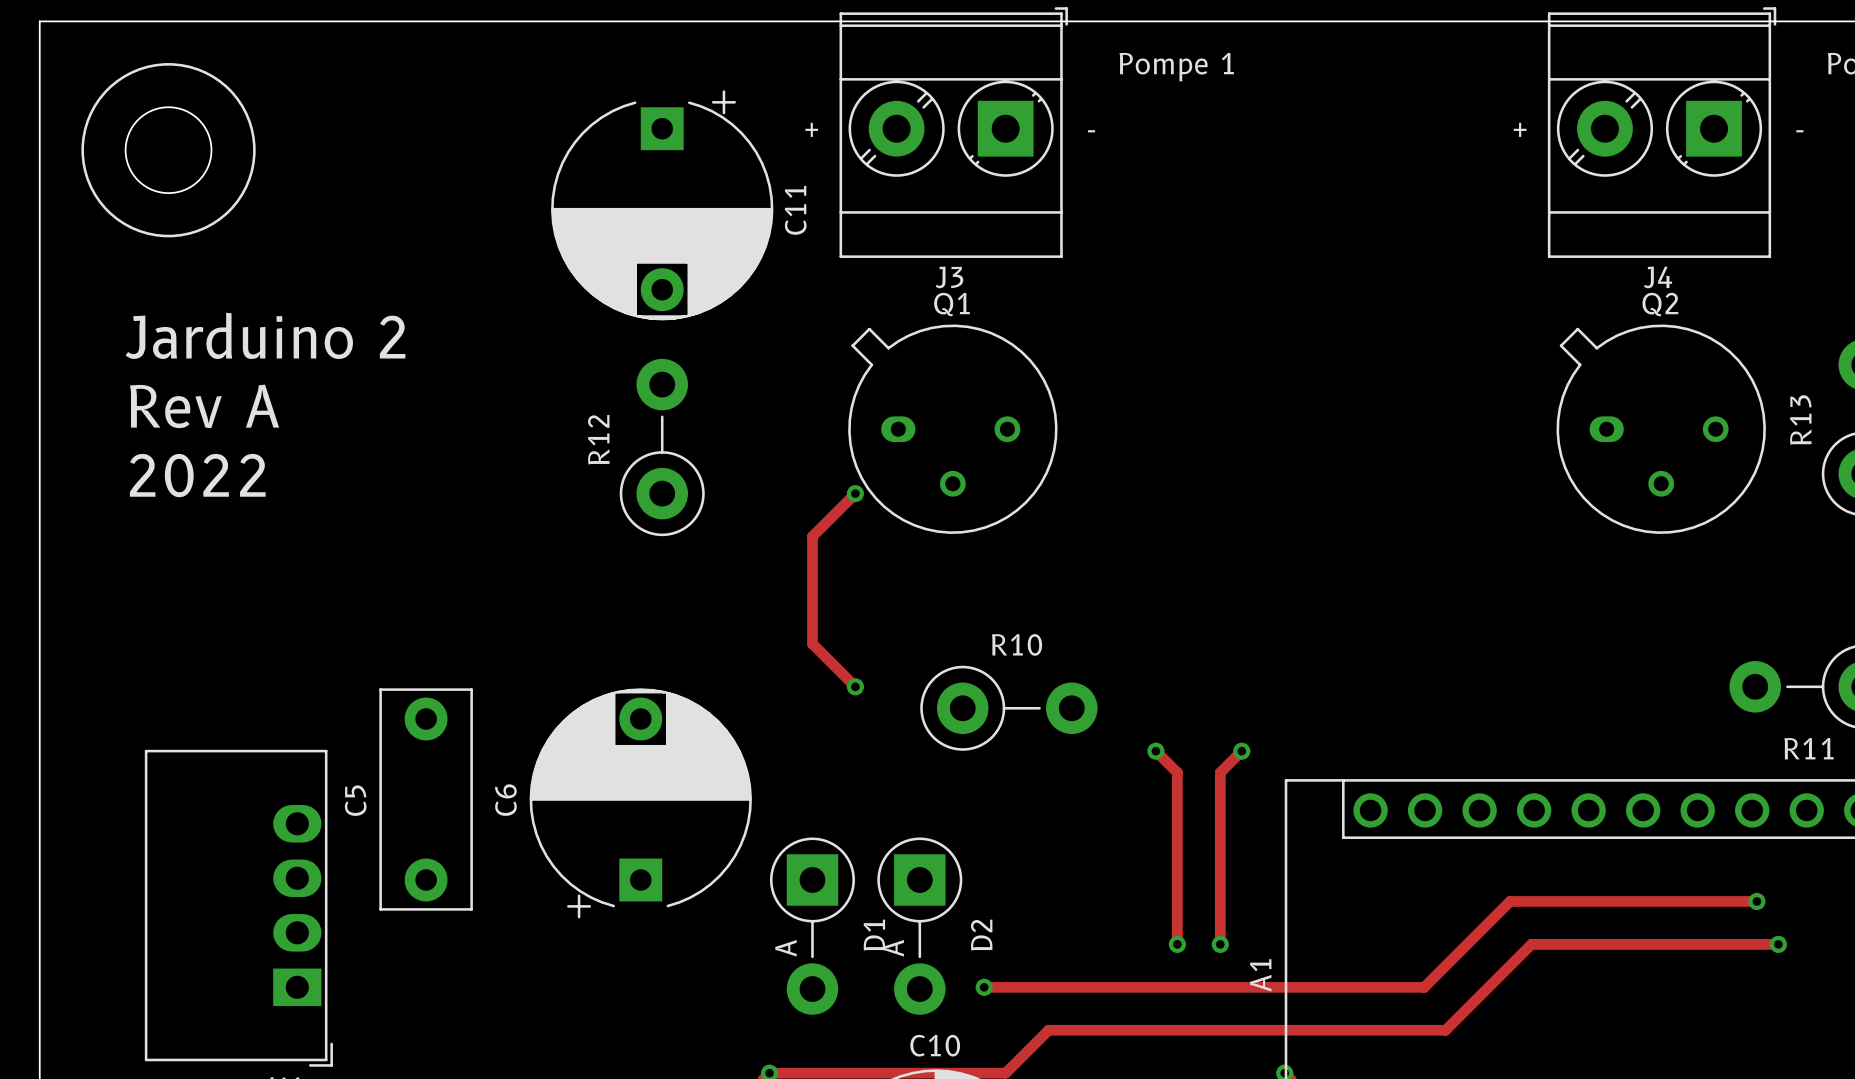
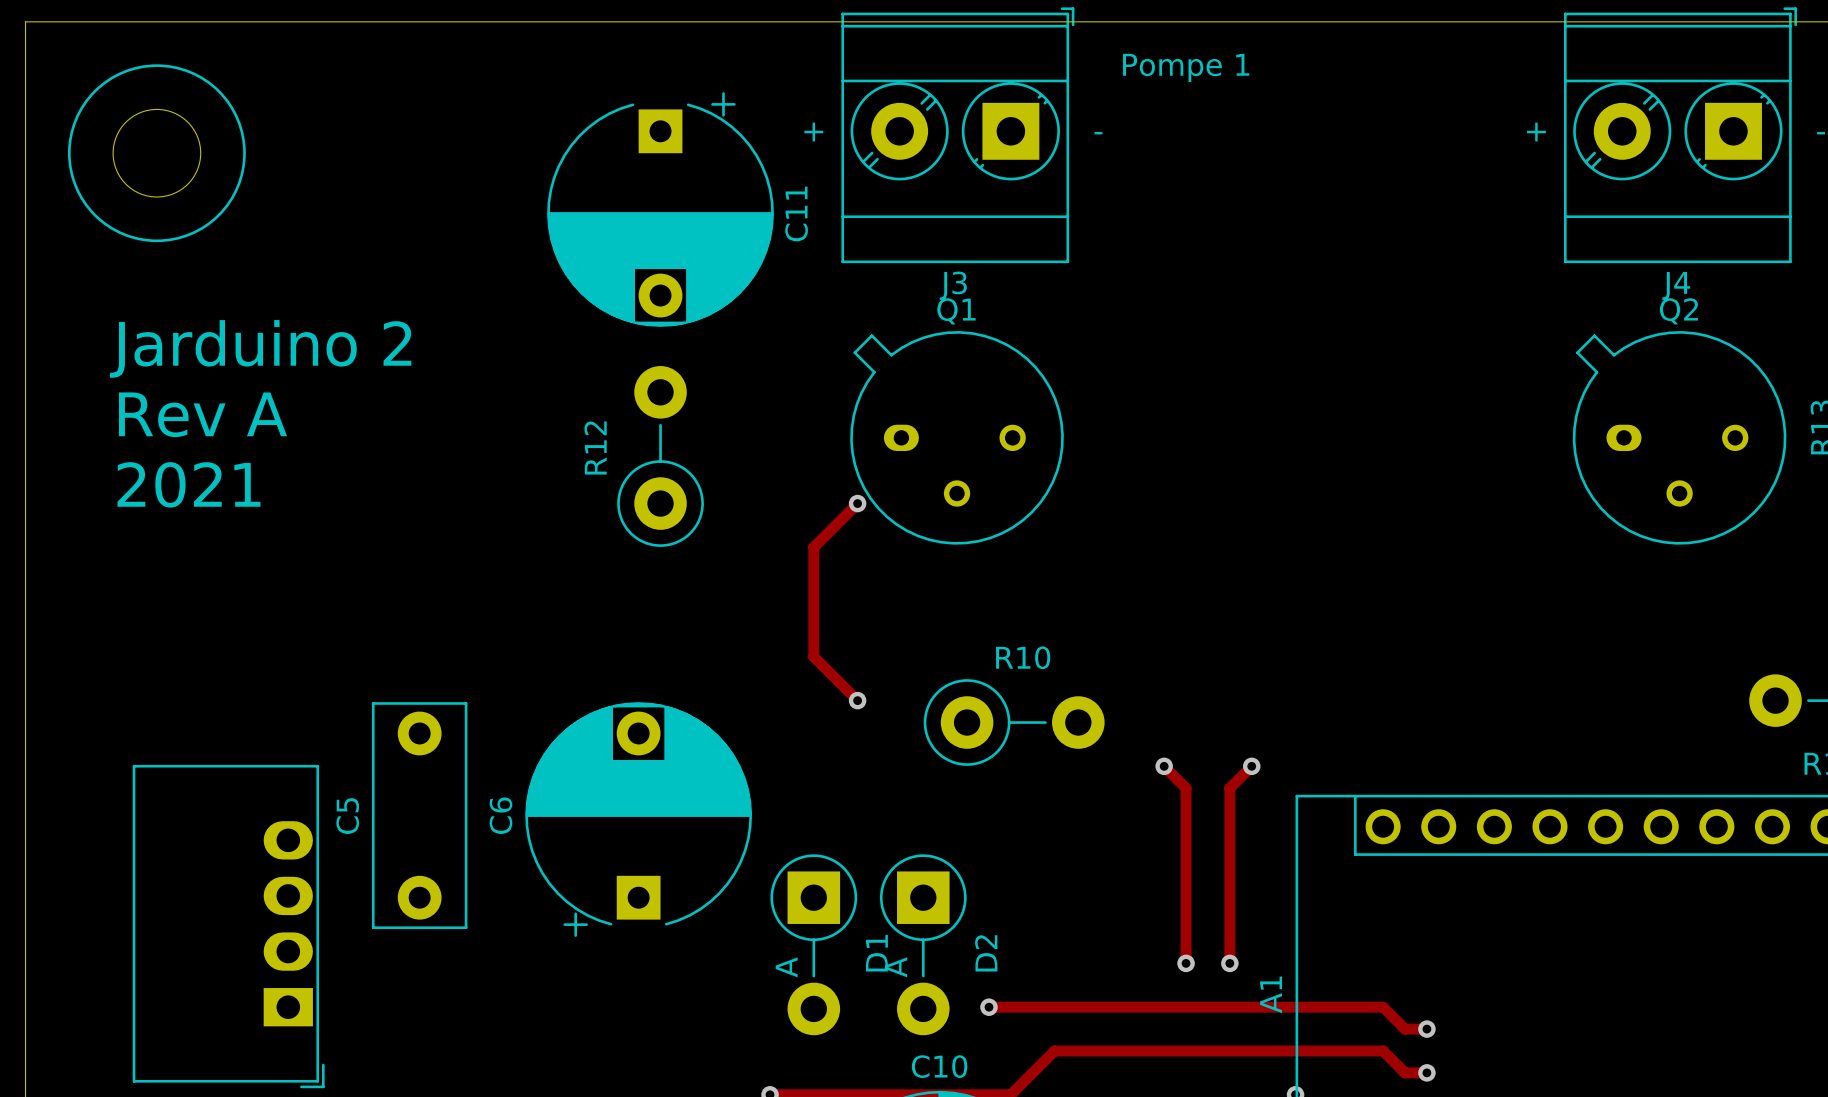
text: 2022 (197, 475) -> 2021 (188, 484)
track: (1756, 901) (1510, 901) (1424, 987) (1370, 987) -> (1426, 1029) (1405, 1029) (1383, 1007)
via: (1756, 901) -> none
track: (1778, 944) (1531, 944) (1445, 1030) (1370, 1030) -> (1426, 1072) (1405, 1072) (1383, 1050)
via: (1778, 944) -> none
via: none -> (1426, 1029)
via: none -> (1426, 1072)

